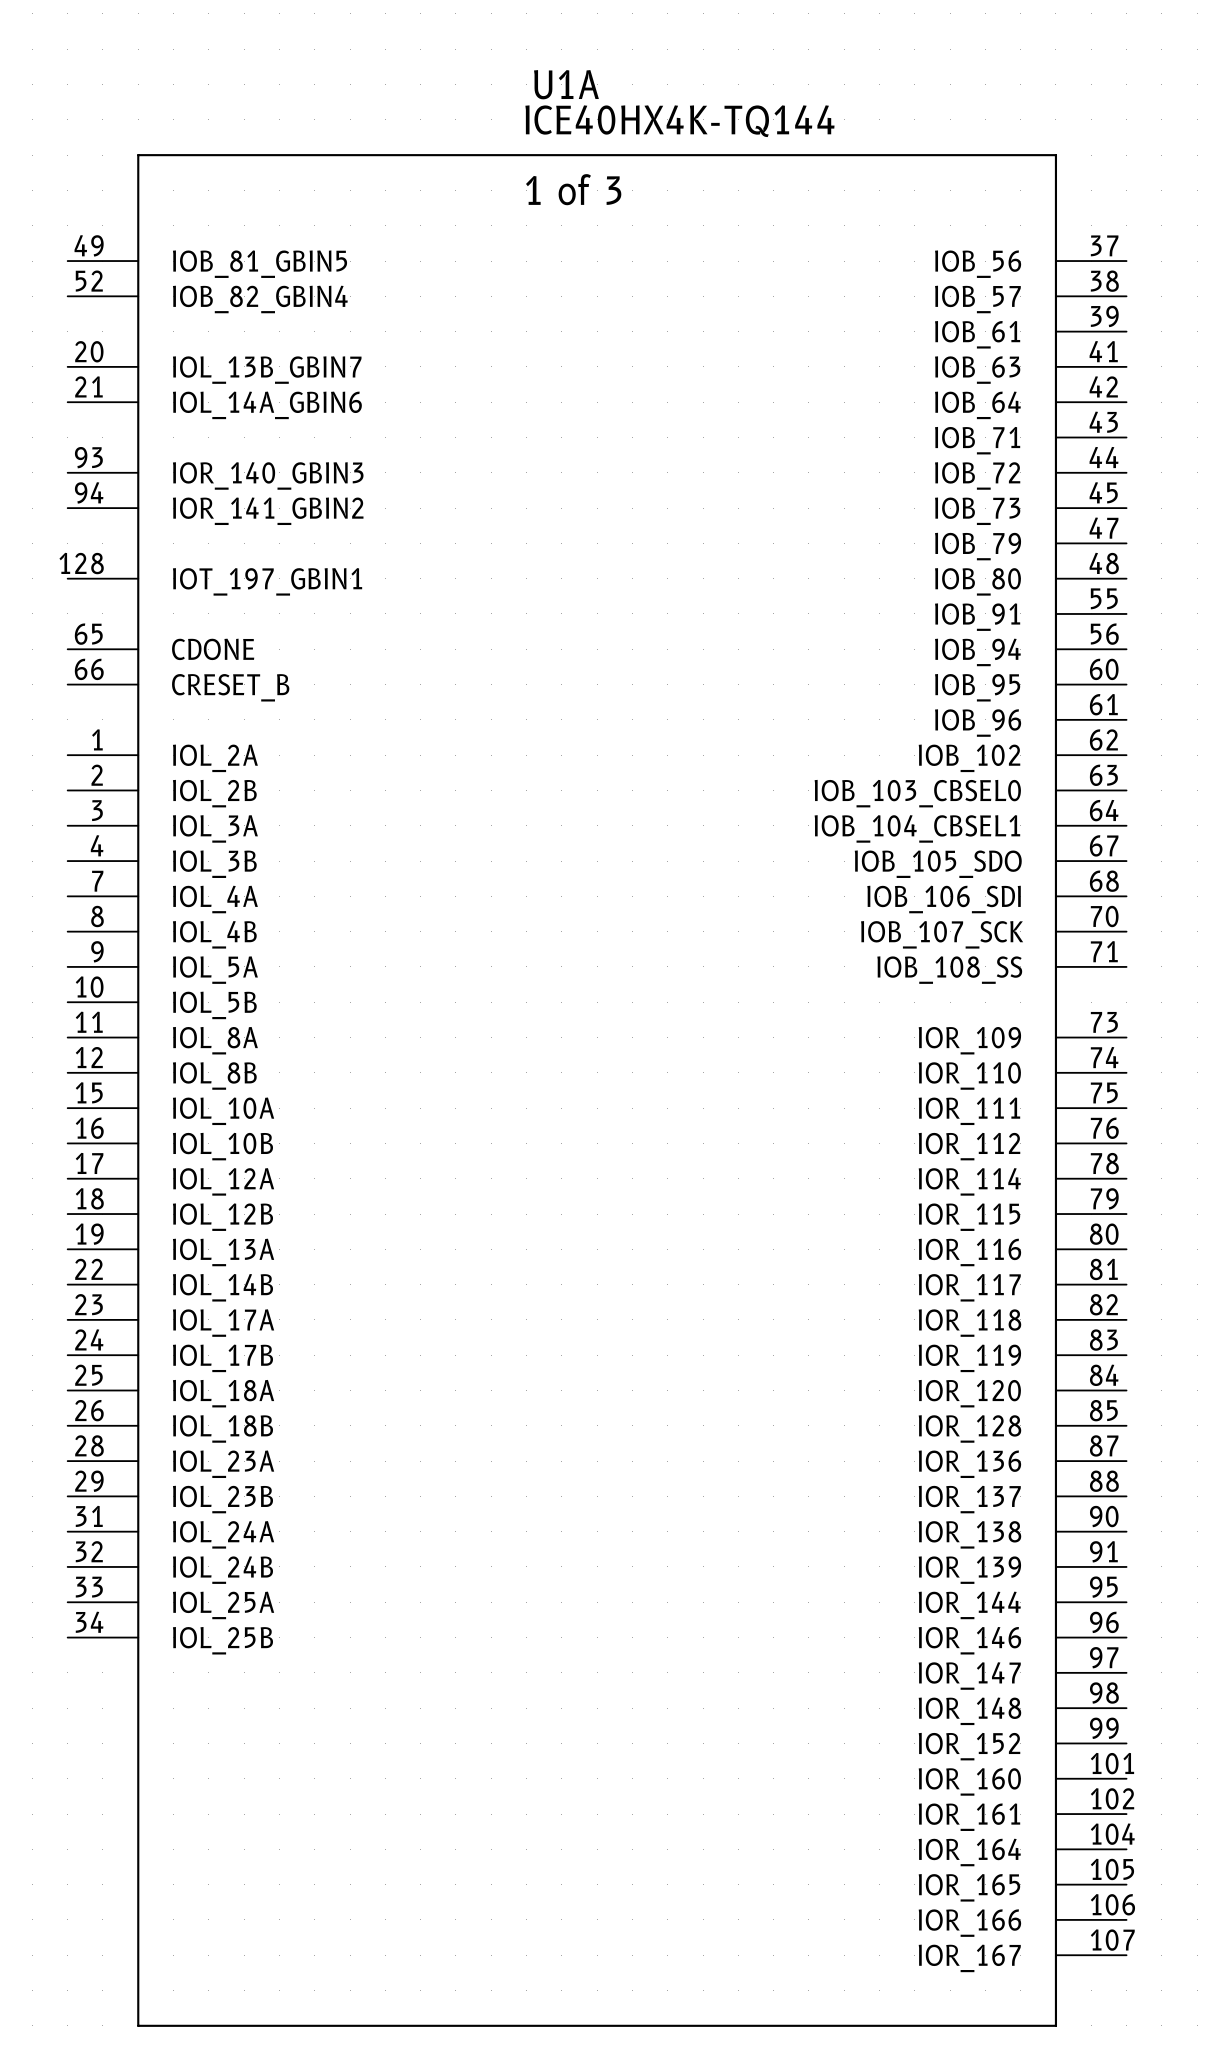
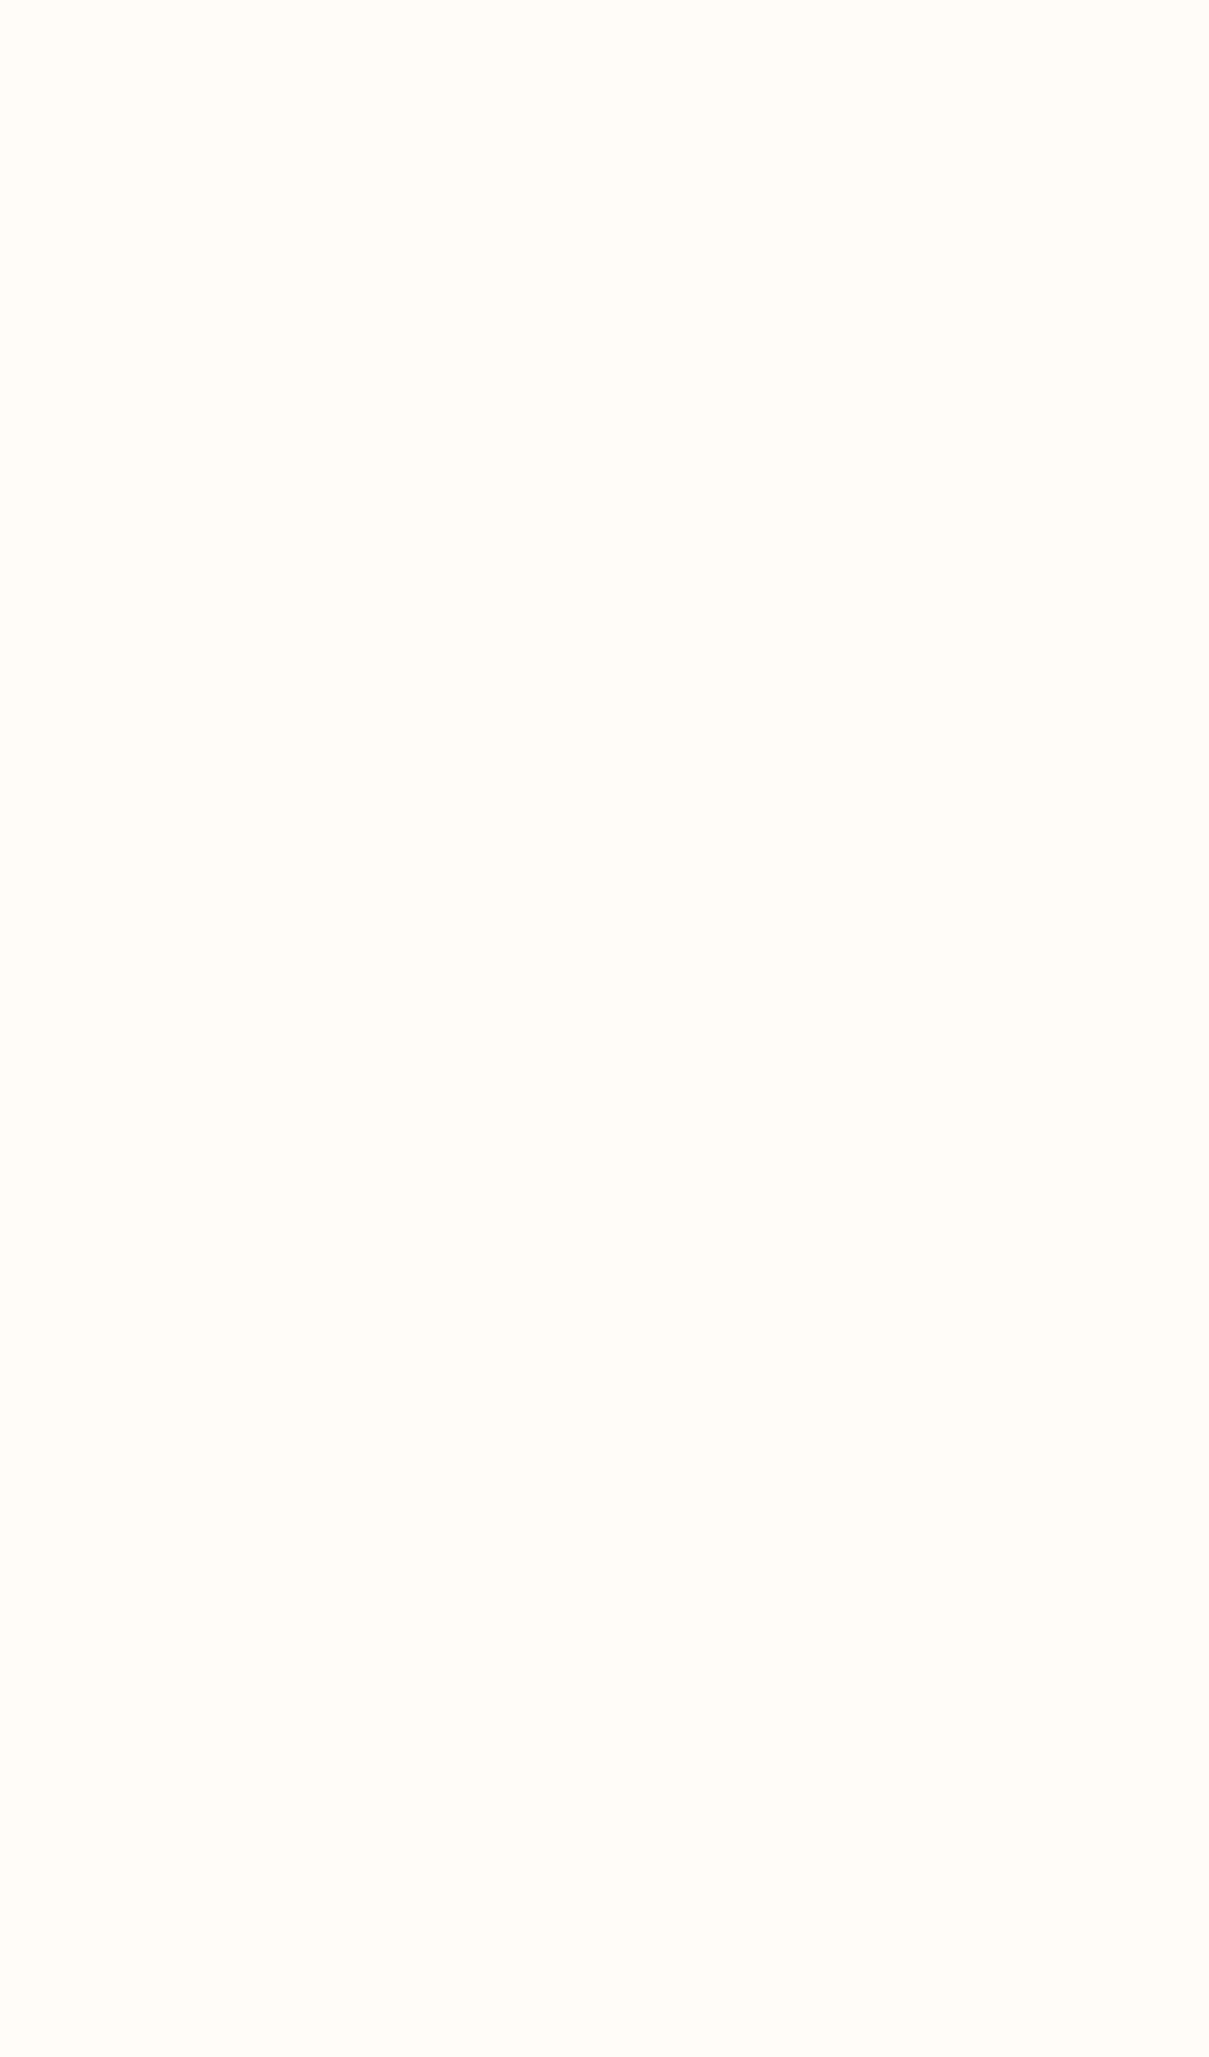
U1A: ICE40HX4K-TQ144 (597, 1090) -> none

